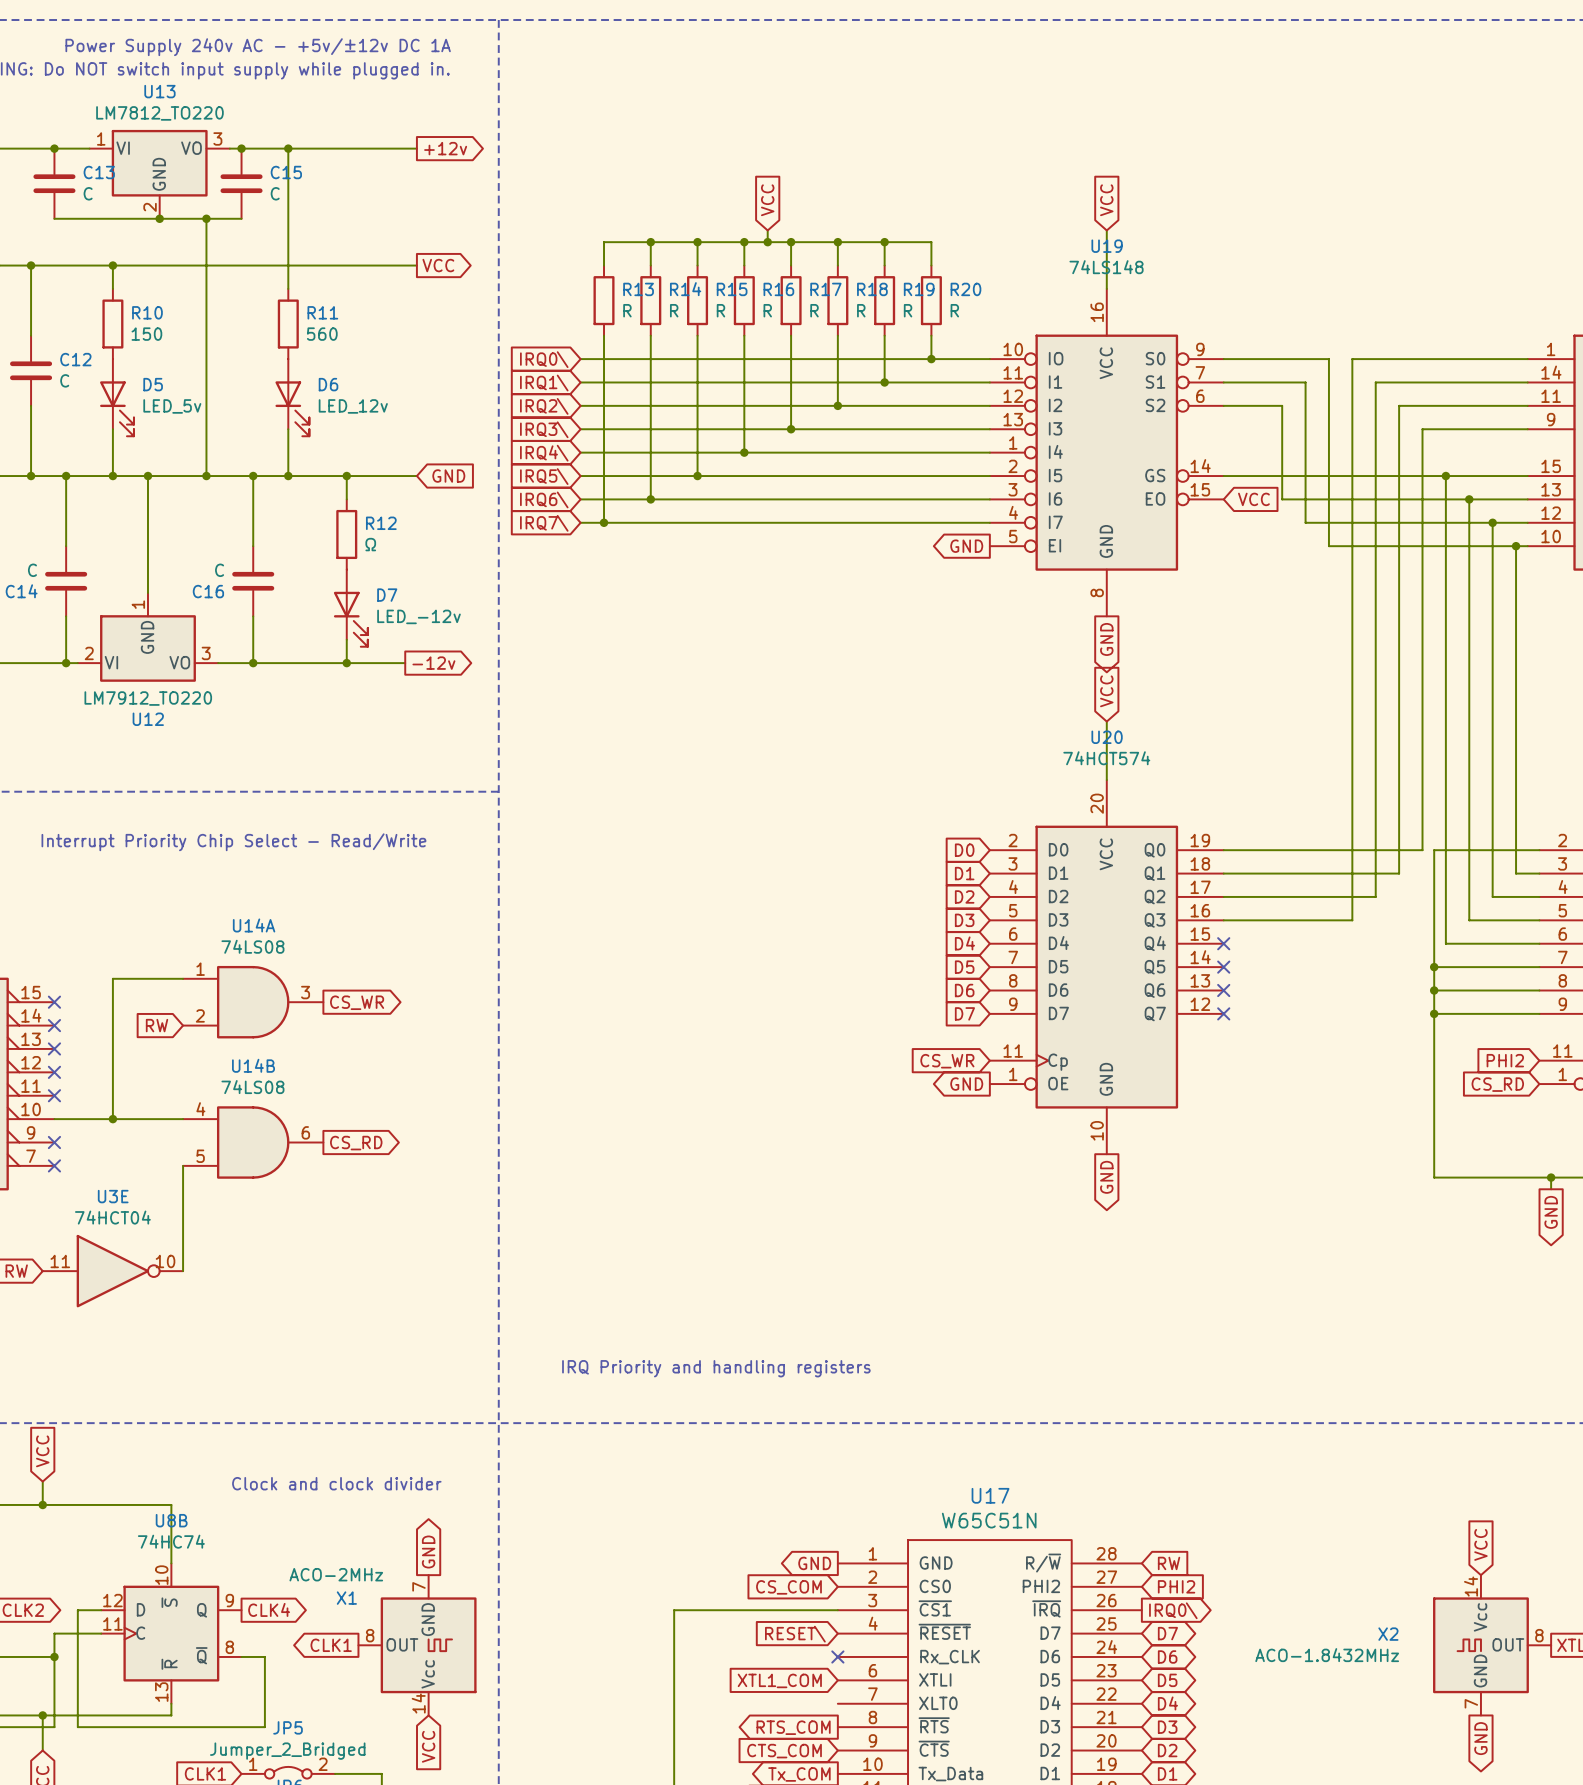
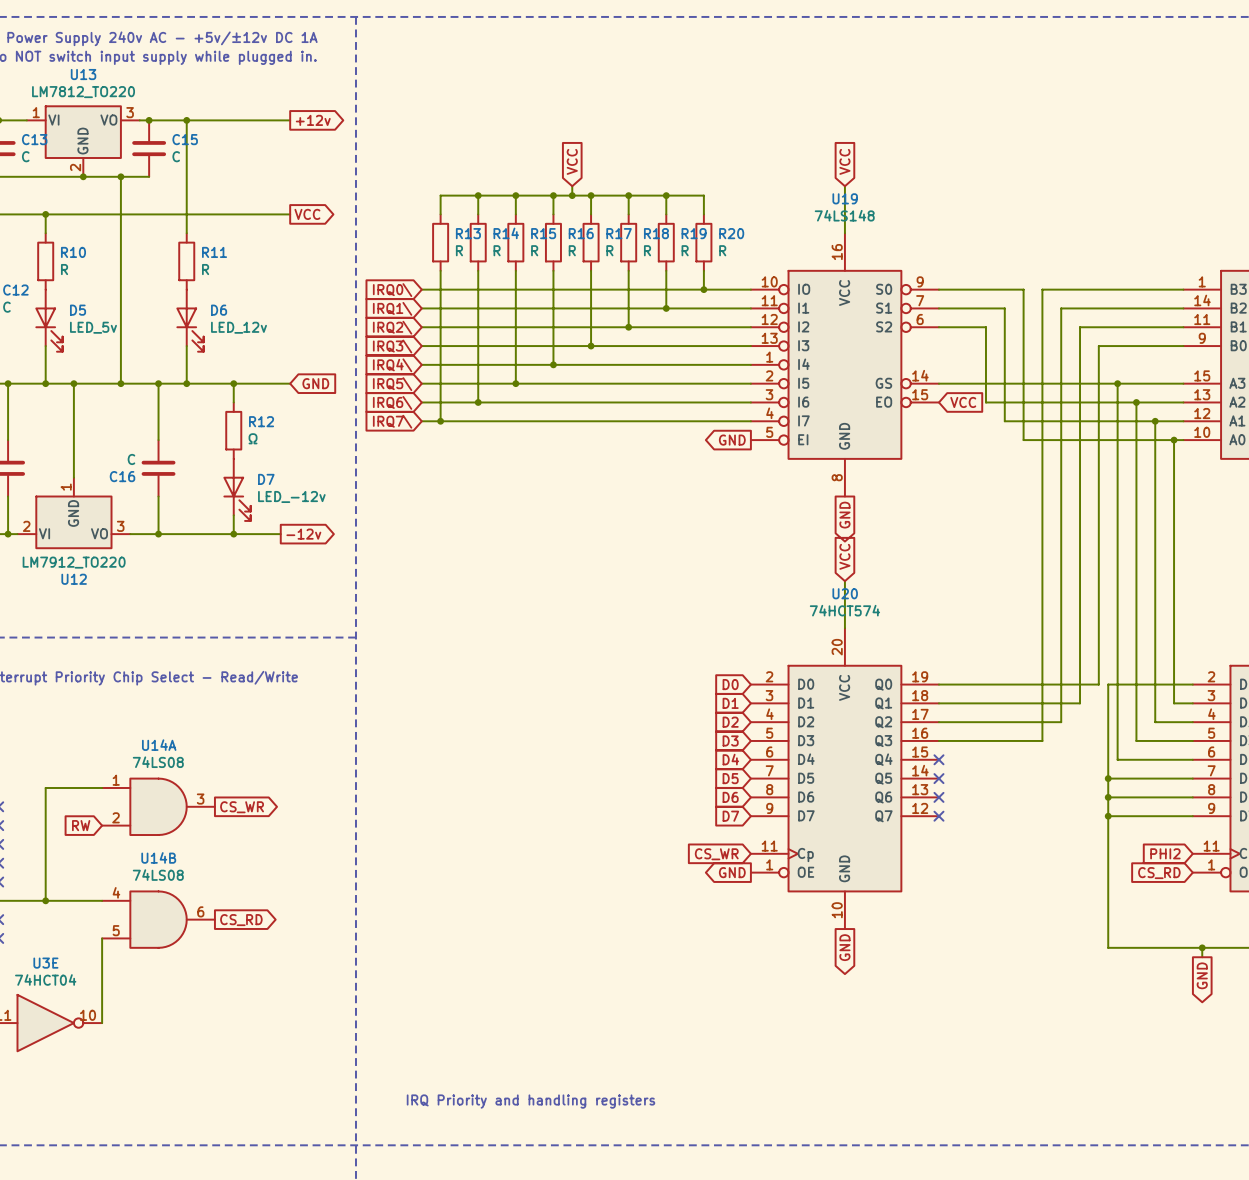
R10 value: 150 (146, 334) -> R (64, 269)
R11 value: 560 (322, 334) -> R (205, 269)

